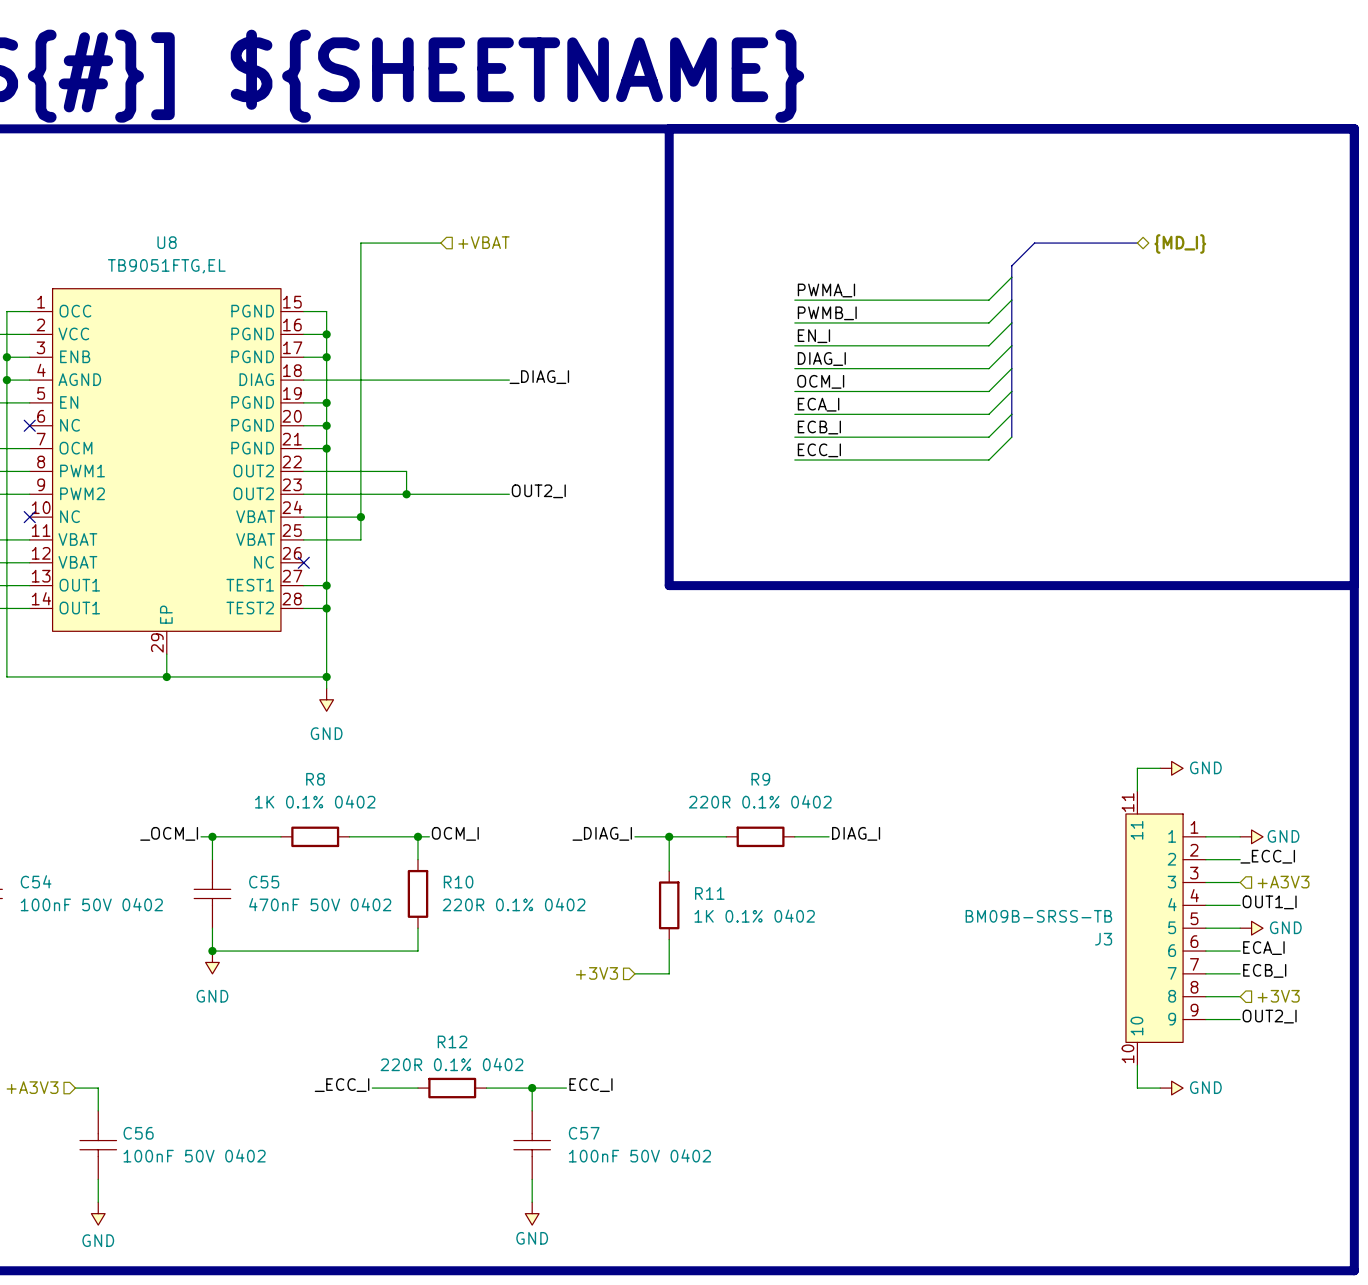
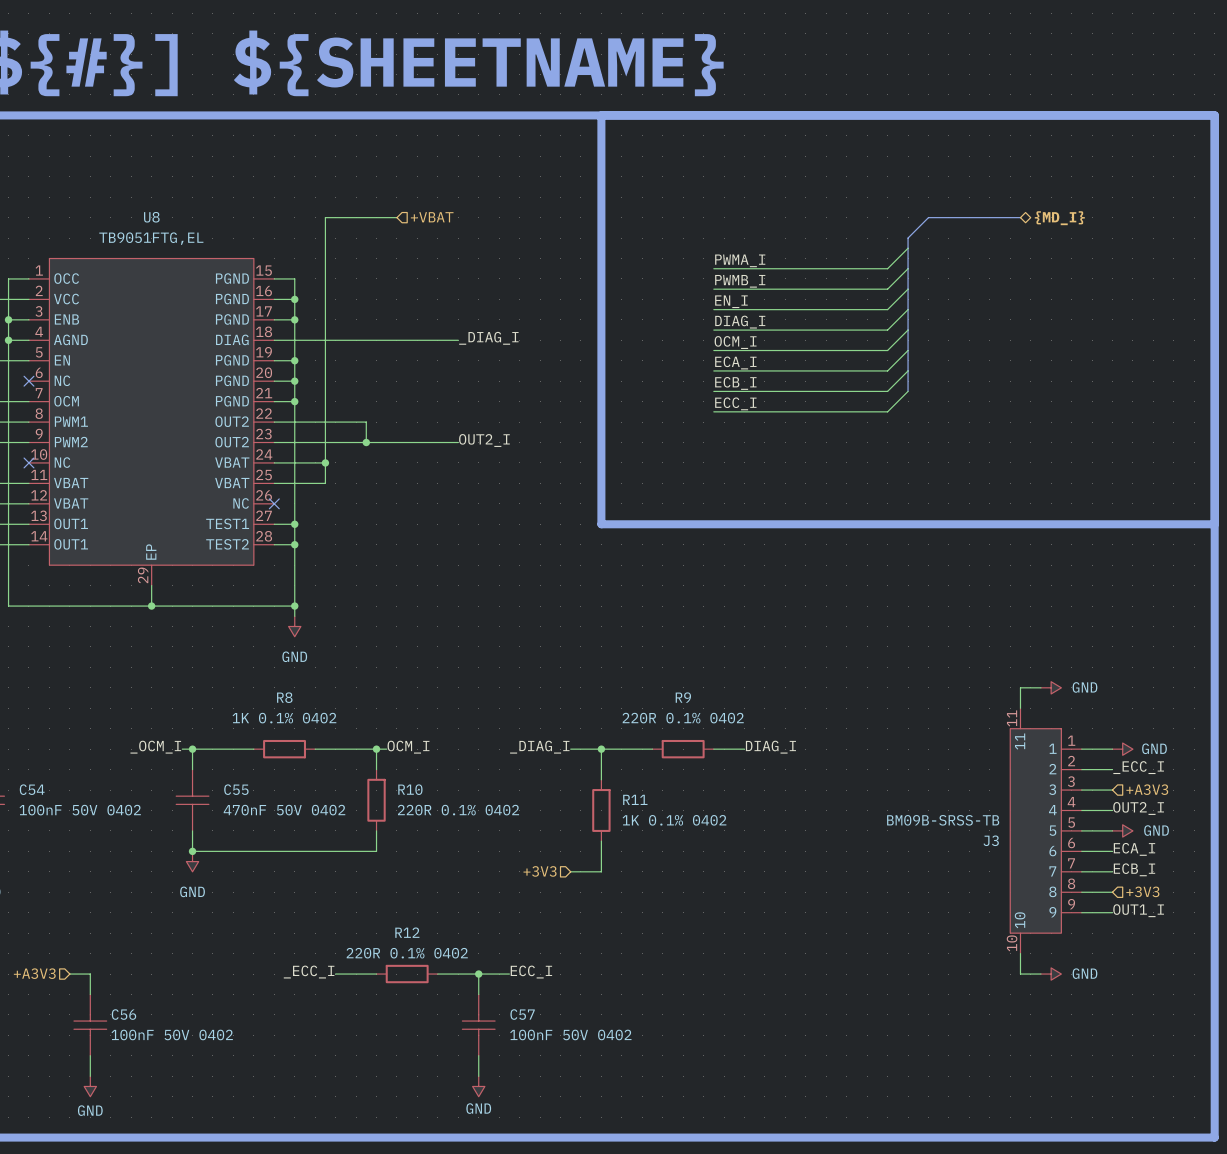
label: OUT1_I (1269, 902) -> OUT2_I (1138, 808)
label: OUT2_I (1269, 1016) -> OUT1_I (1138, 910)

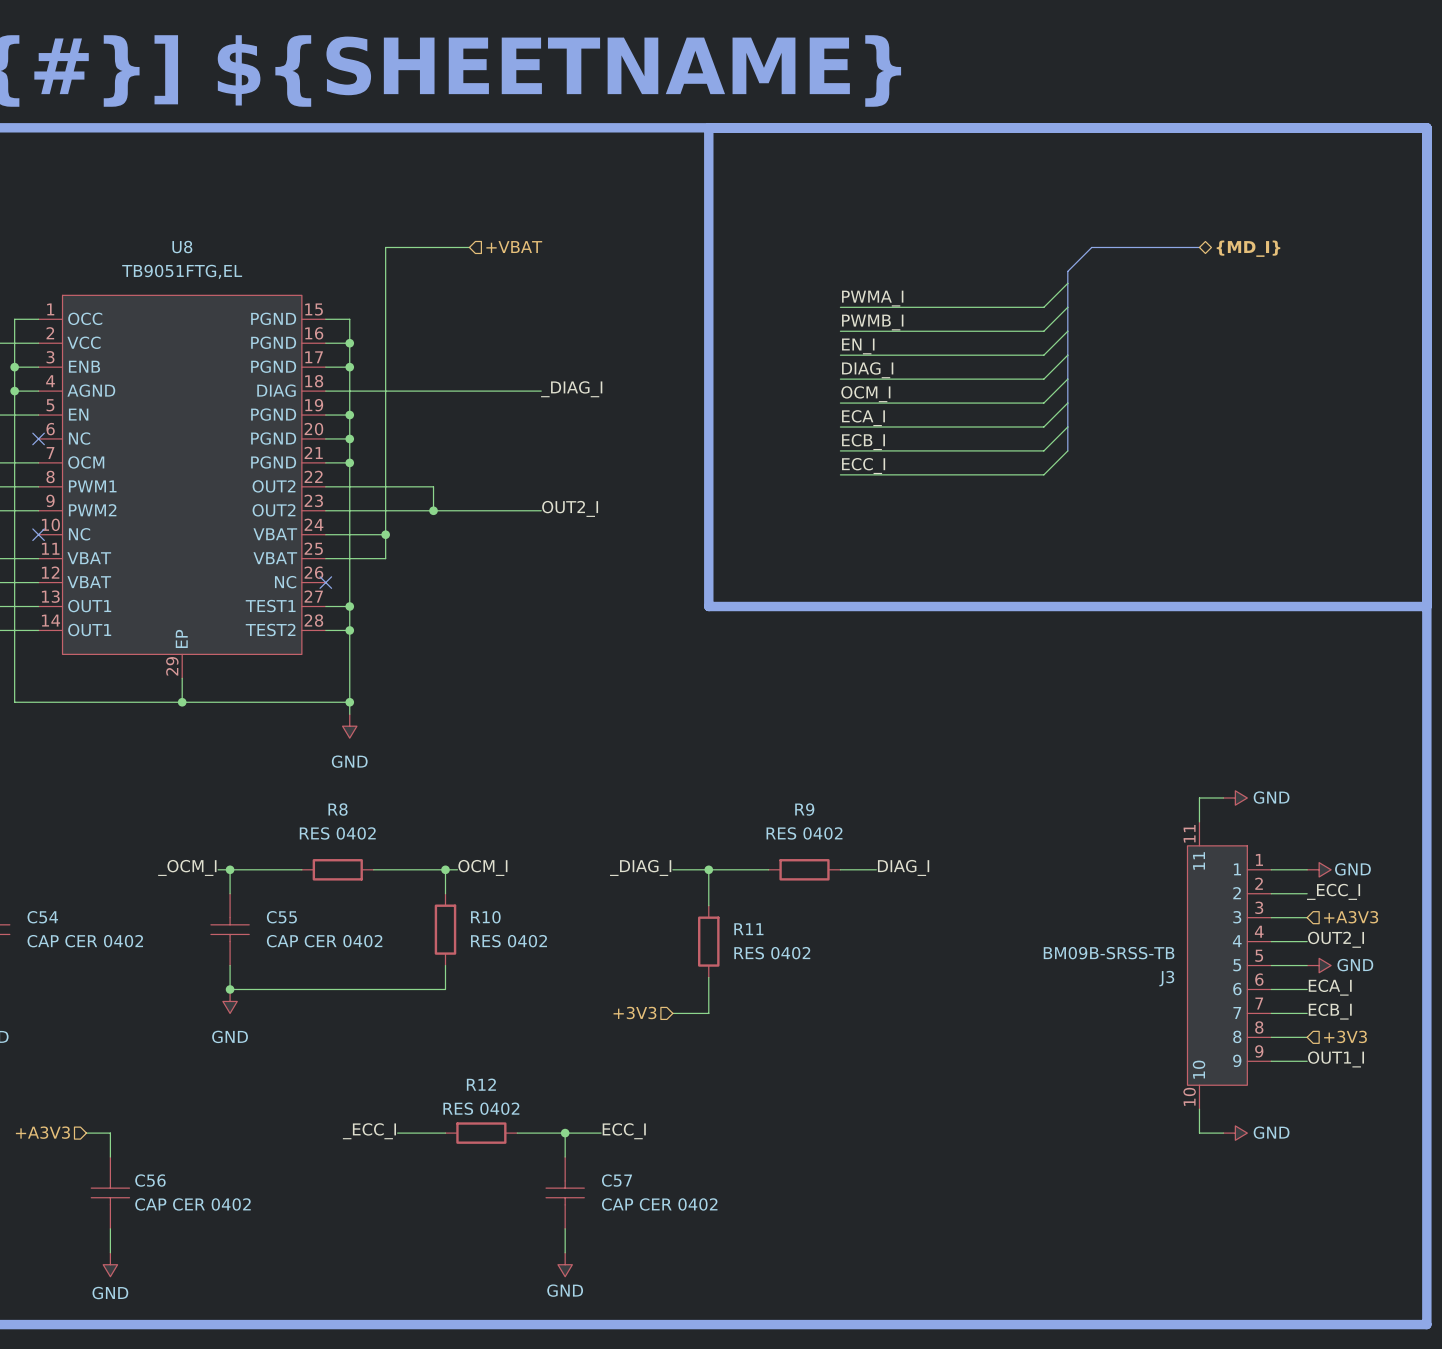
R8 value: 1K 0.1% 0402 (284, 718) -> RES 0402 (337, 833)
R9 value: 220R 0.1% 0402 (683, 718) -> RES 0402 (804, 833)
C54 value: 100nF 50V 0402 (80, 810) -> CAP CER 0402 (85, 941)
C55 value: 470nF 50V 0402 (284, 810) -> CAP CER 0402 (324, 941)
R10 value: 220R 0.1% 0402 (458, 810) -> RES 0402 (509, 941)
R11 value: 1K 0.1% 0402 (674, 820) -> RES 0402 (772, 953)
R12 value: 220R 0.1% 0402 (407, 953) -> RES 0402 (481, 1108)
C56 value: 100nF 50V 0402 (172, 1034) -> CAP CER 0402 (192, 1204)
C57 value: 100nF 50V 0402 (570, 1034) -> CAP CER 0402 (659, 1204)

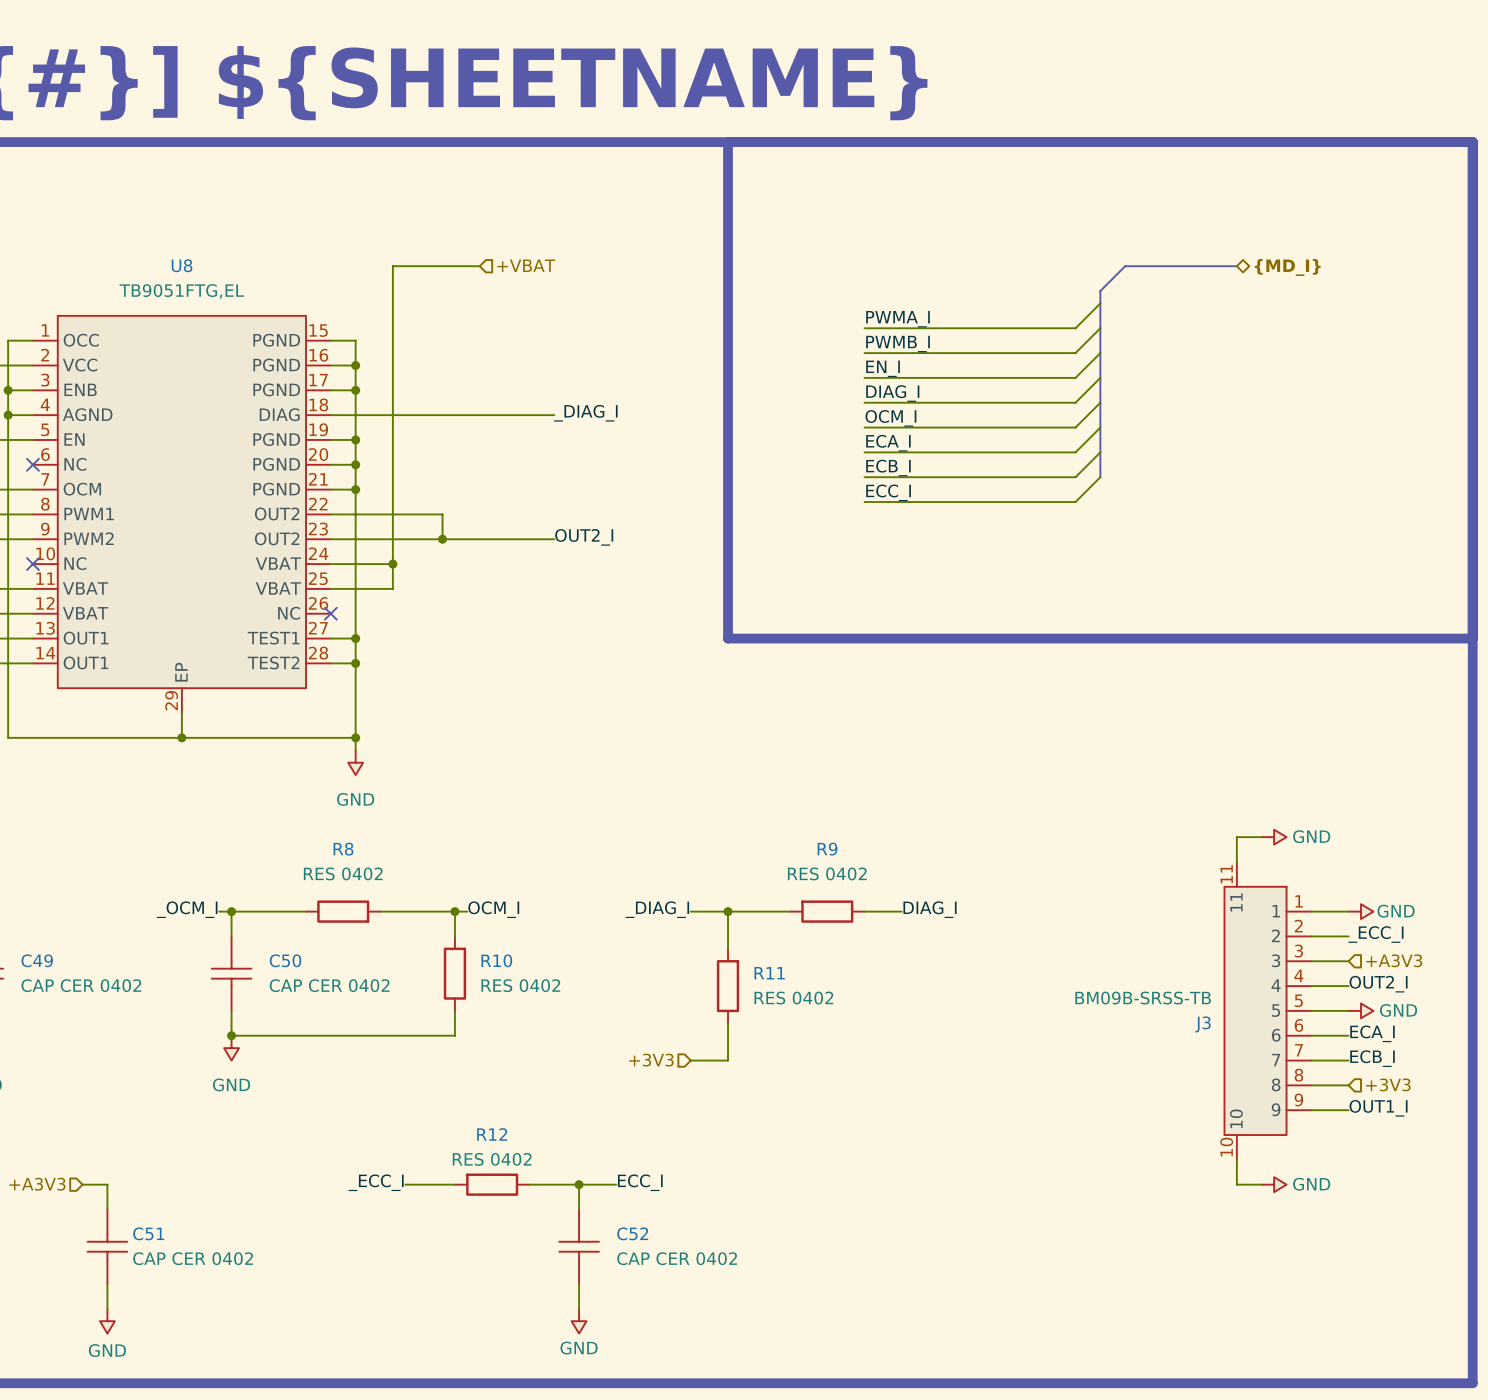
C54 name: C54 (42, 917) -> C49 (37, 960)
C55 name: C55 (281, 917) -> C50 (285, 960)
C56 name: C56 (150, 1180) -> C51 (148, 1233)
C57 name: C57 (617, 1180) -> C52 (632, 1233)

